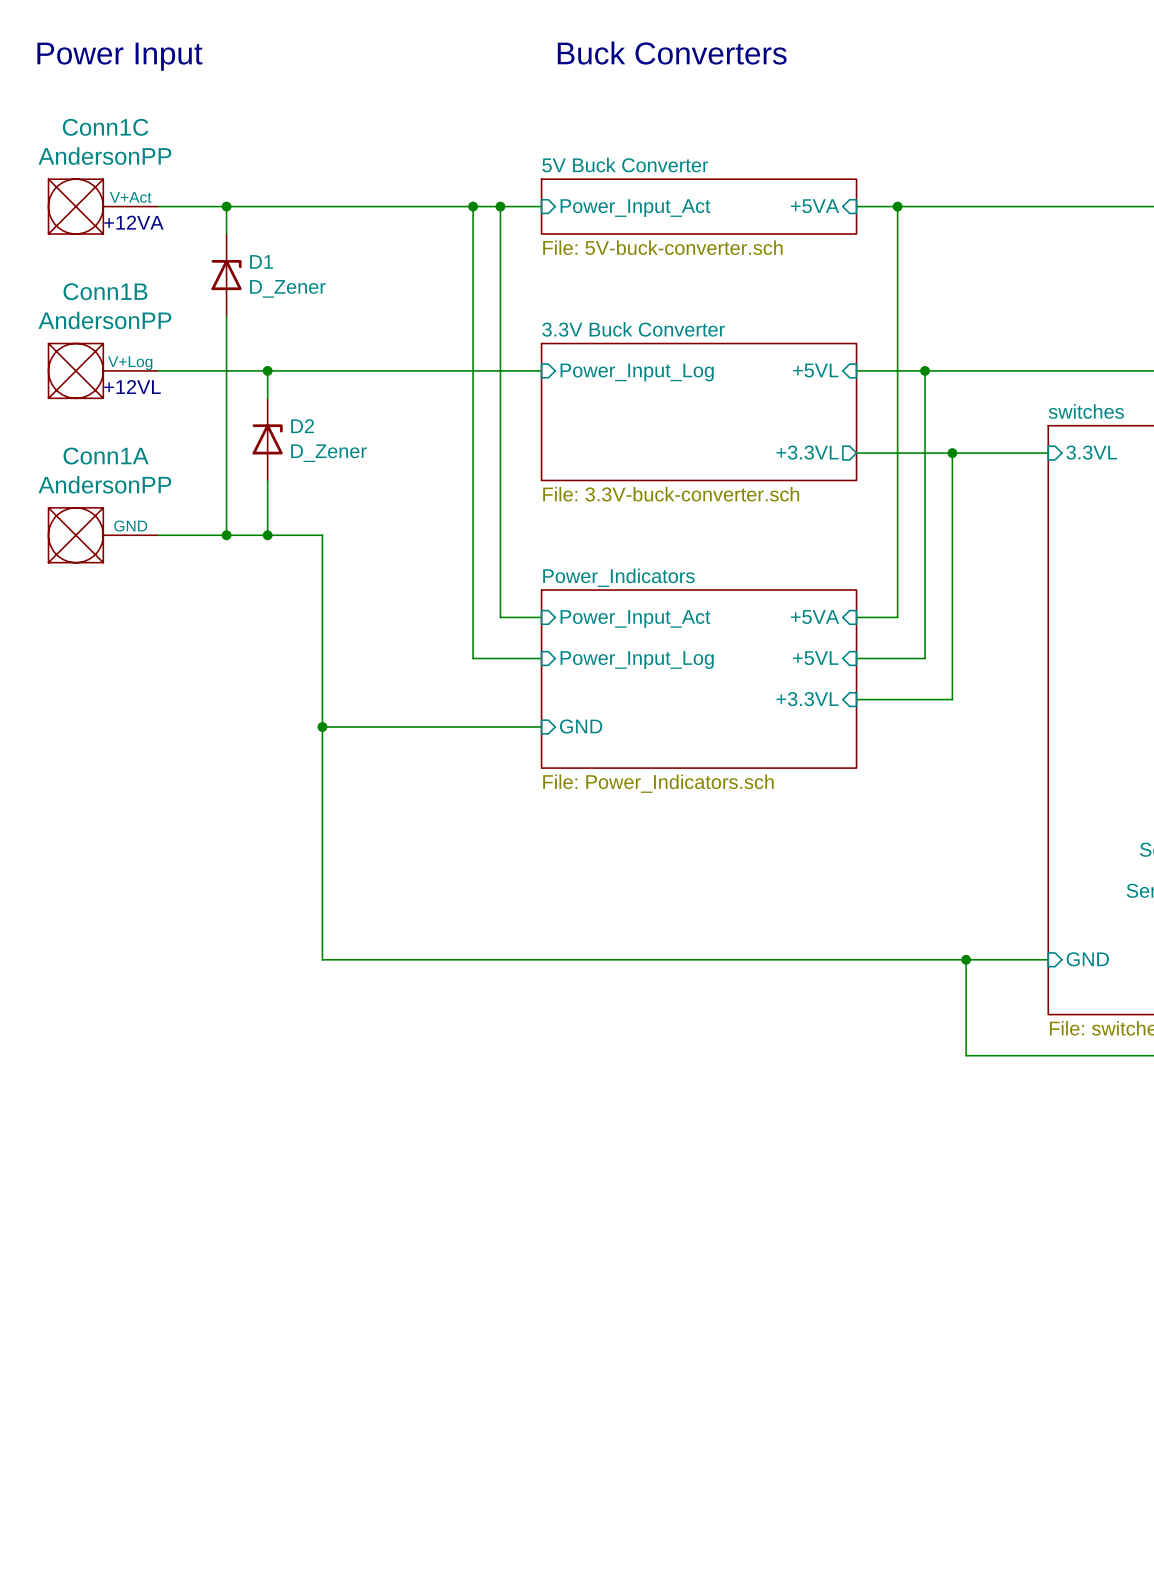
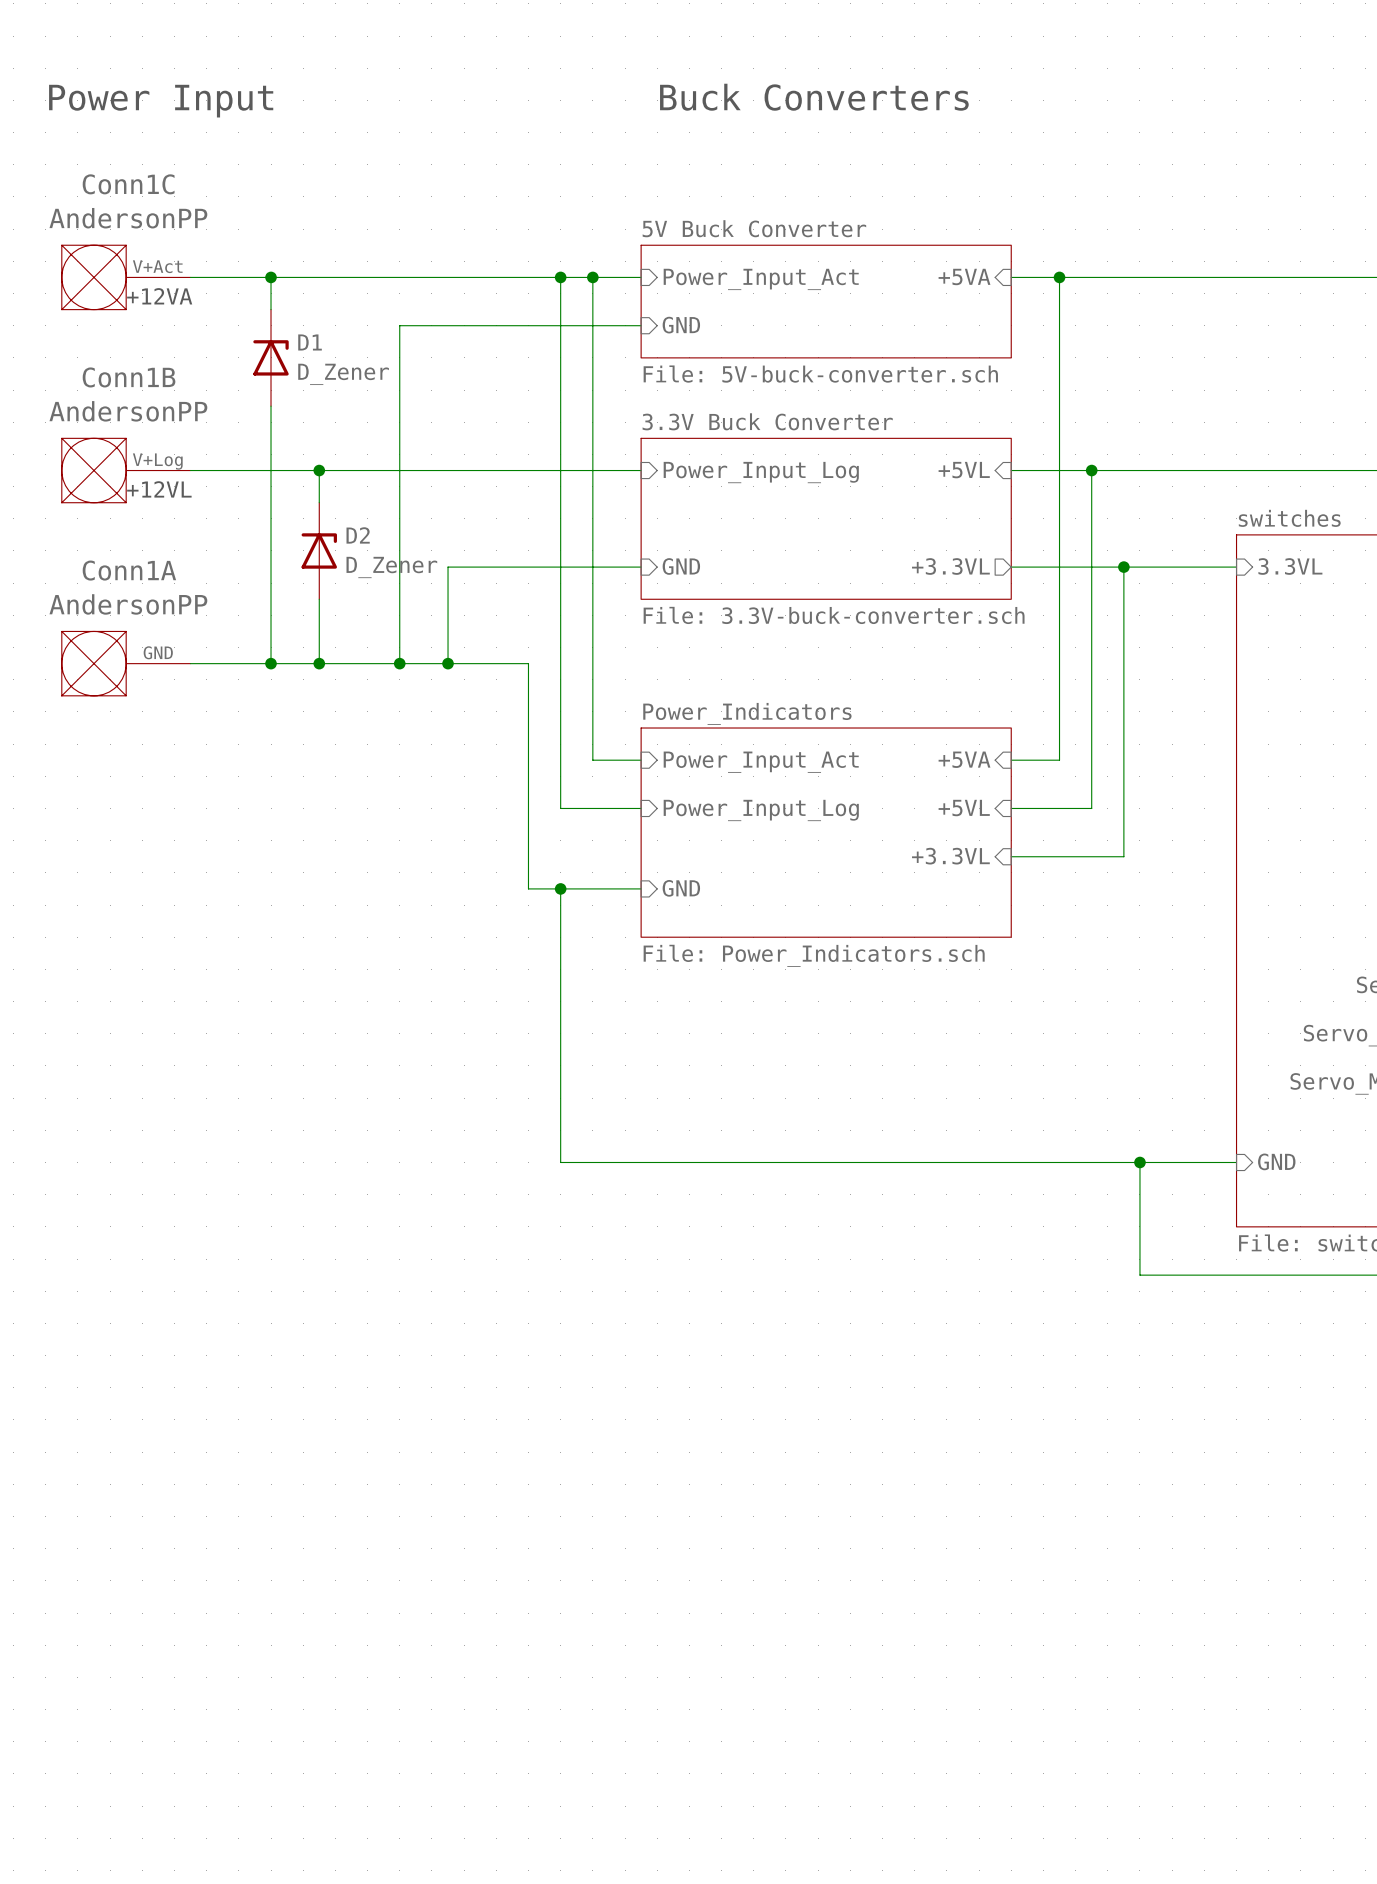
sheet 5V Buck Converter shape: [541, 179, 857, 234] -> [641, 245, 1012, 358]
wire: none -> (641, 325) (399, 325) (399, 663)
sheet pin: none -> GND (681, 325)
sheet pin: none -> GND (681, 566)
wire: none -> (641, 567) (448, 567) (448, 663)
wire: (322, 535) (322, 959) (473, 959) -> (560, 888) (560, 1162)
junction: none -> (399, 663)
junction: none -> (448, 663)
wire: (322, 726) (445, 726) -> (383, 663) (528, 663) (528, 888)
junction: (322, 726) -> none
junction: none -> (560, 888)

